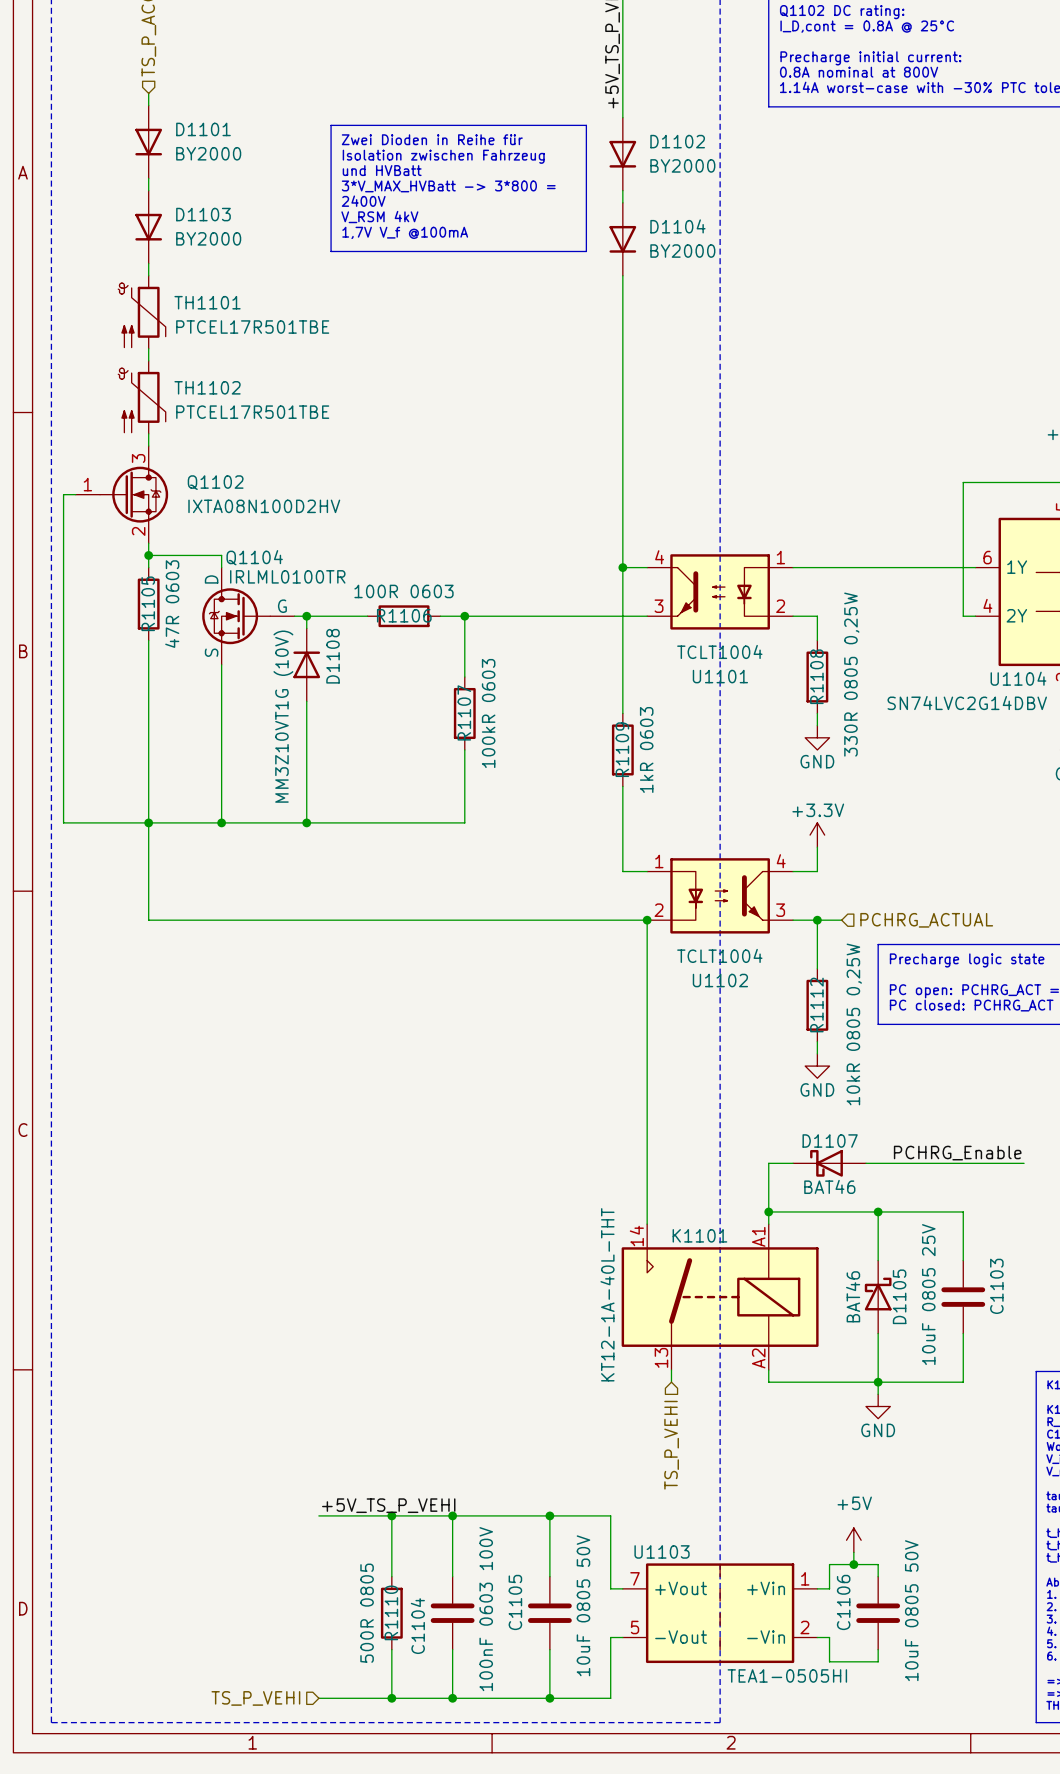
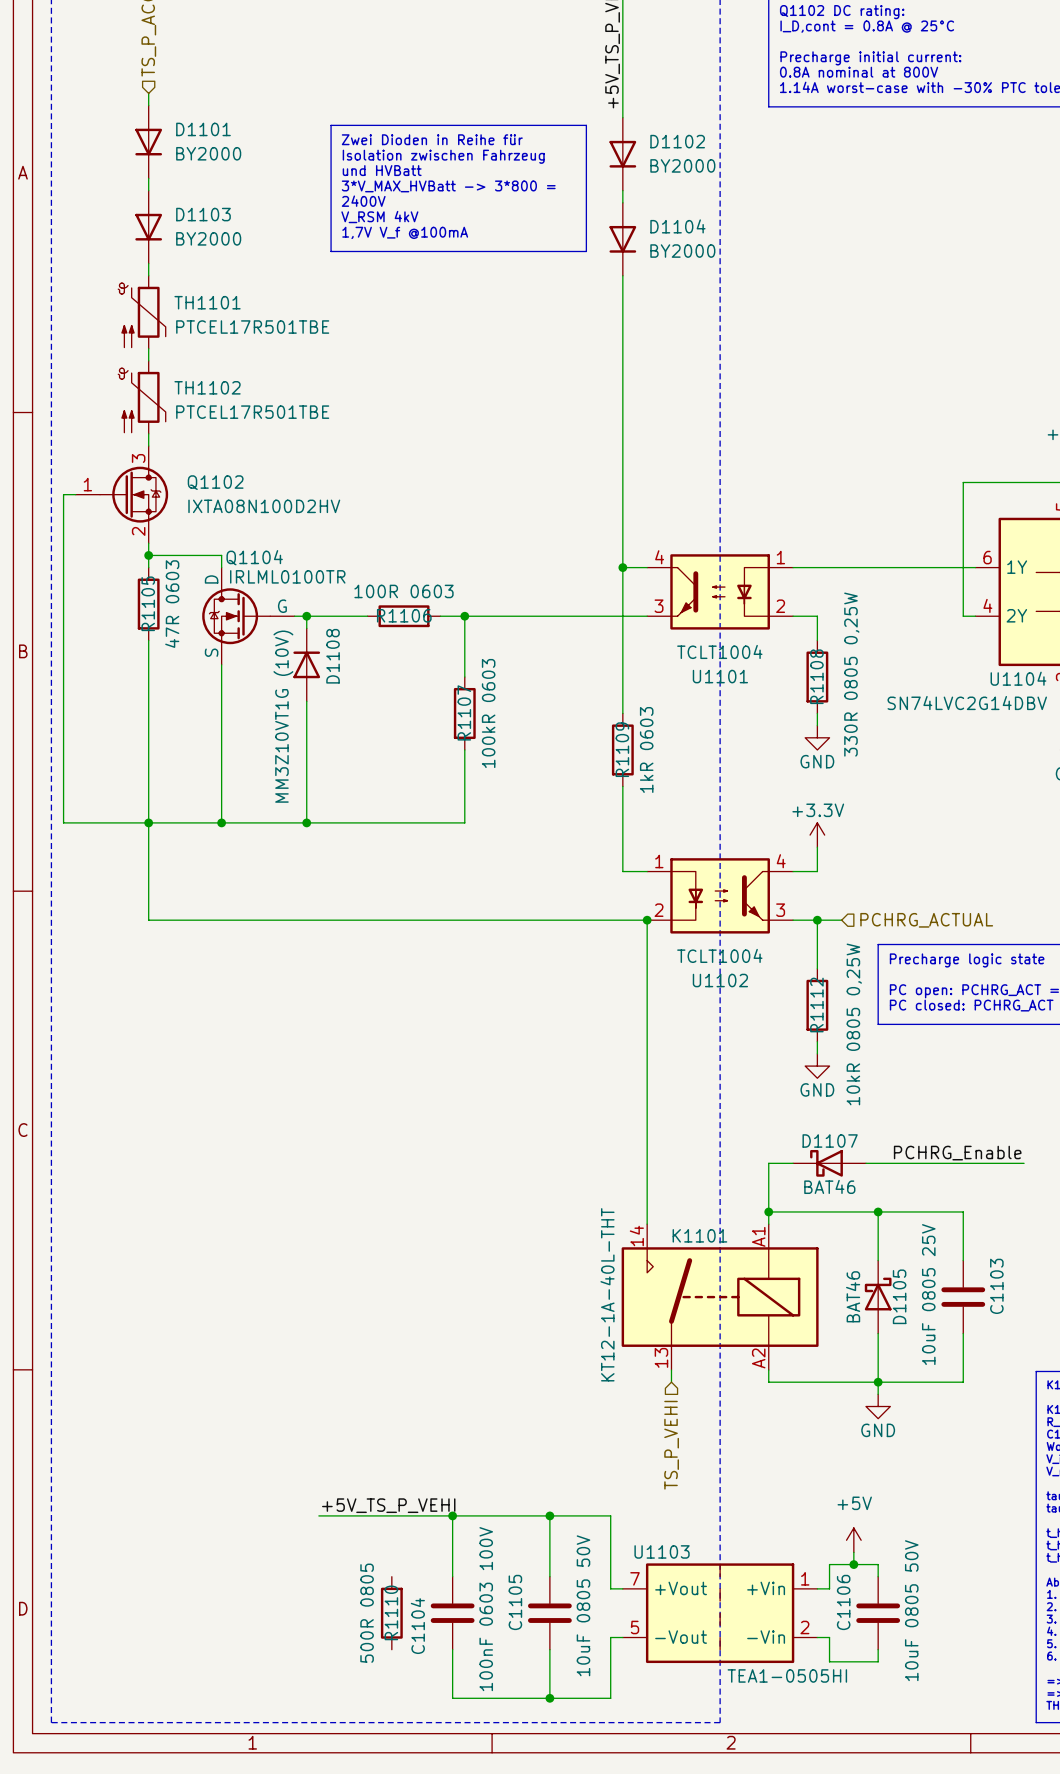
wire: (391, 1515) (391, 1576) -> none
junction: (391, 1515) -> none
wire: (391, 1649) (391, 1698) -> none
hierarchical label: TS_P_VEHI (255, 1698) -> none
wire: (318, 1698) (452, 1698) -> none
junction: (391, 1698) -> none
junction: (452, 1698) -> none

